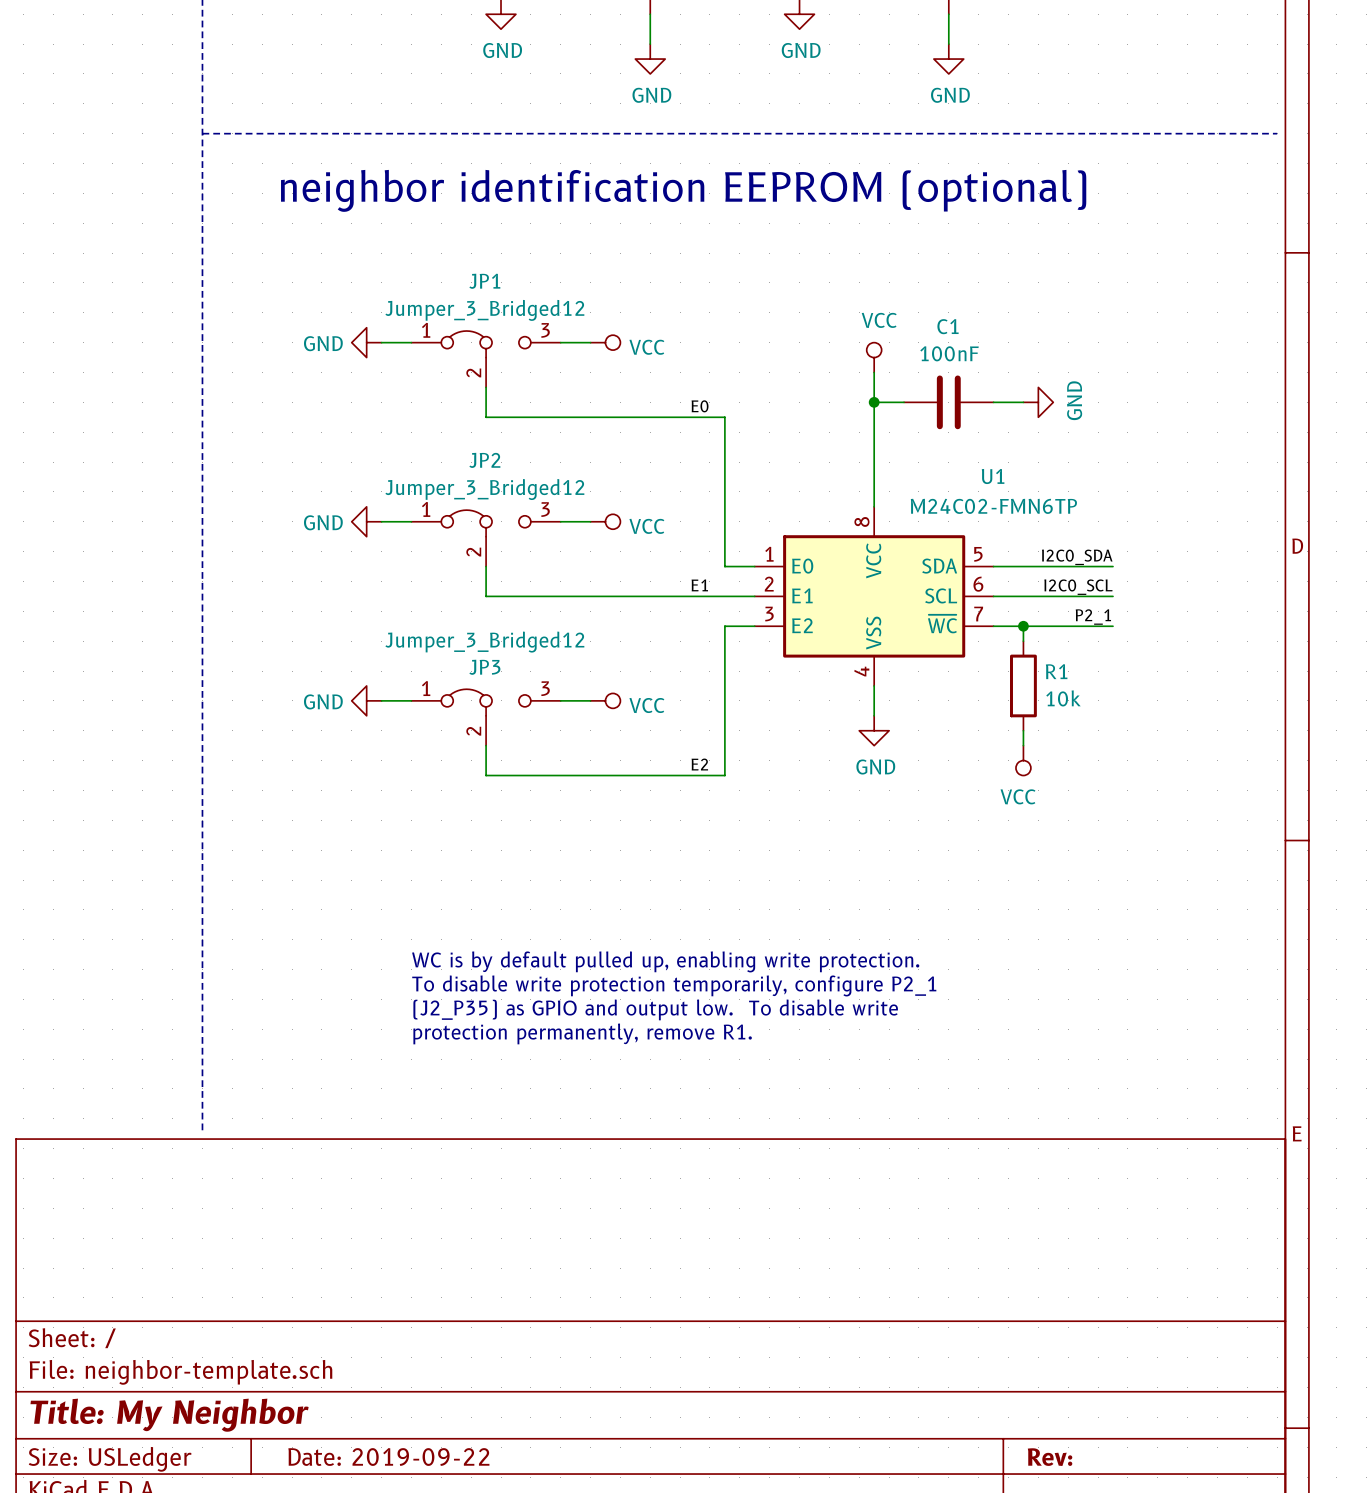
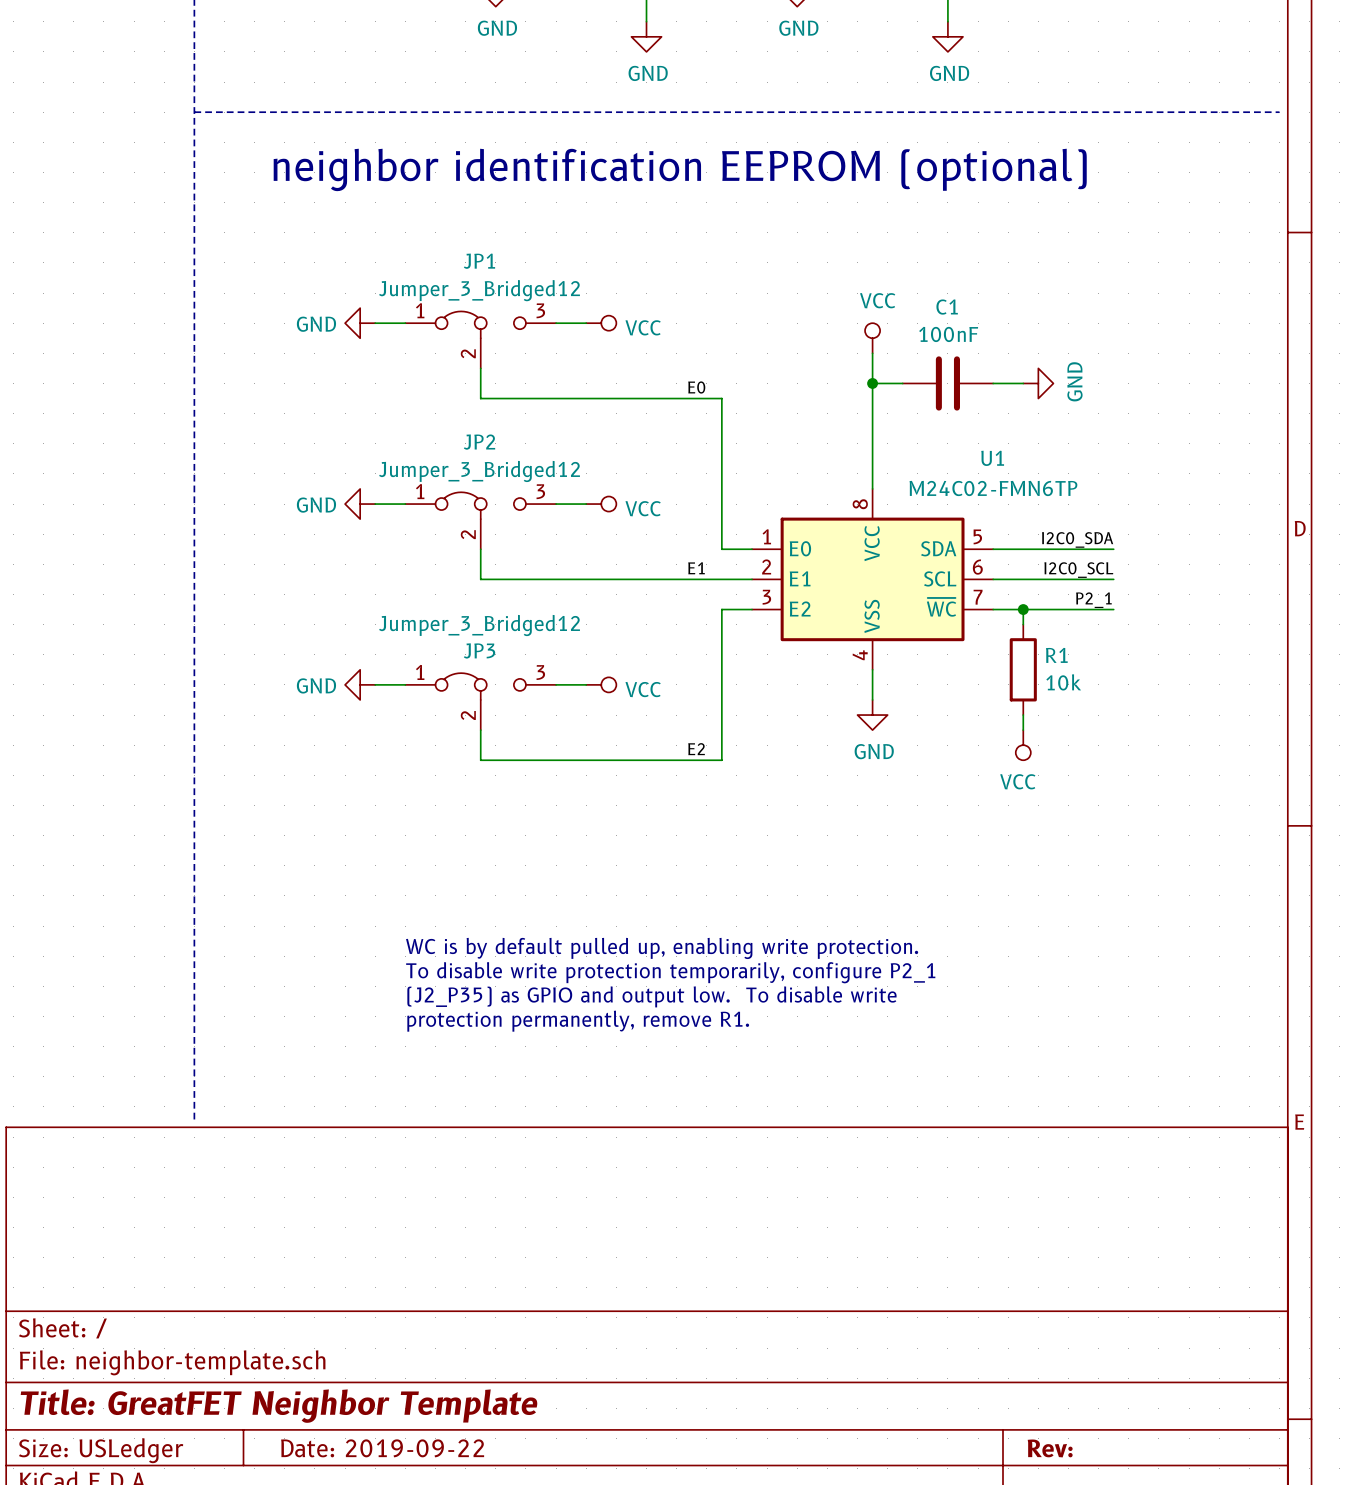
title block: Title: My Neighbor (169, 1415) -> Title: GreatFET Neighbor Template (279, 1406)

